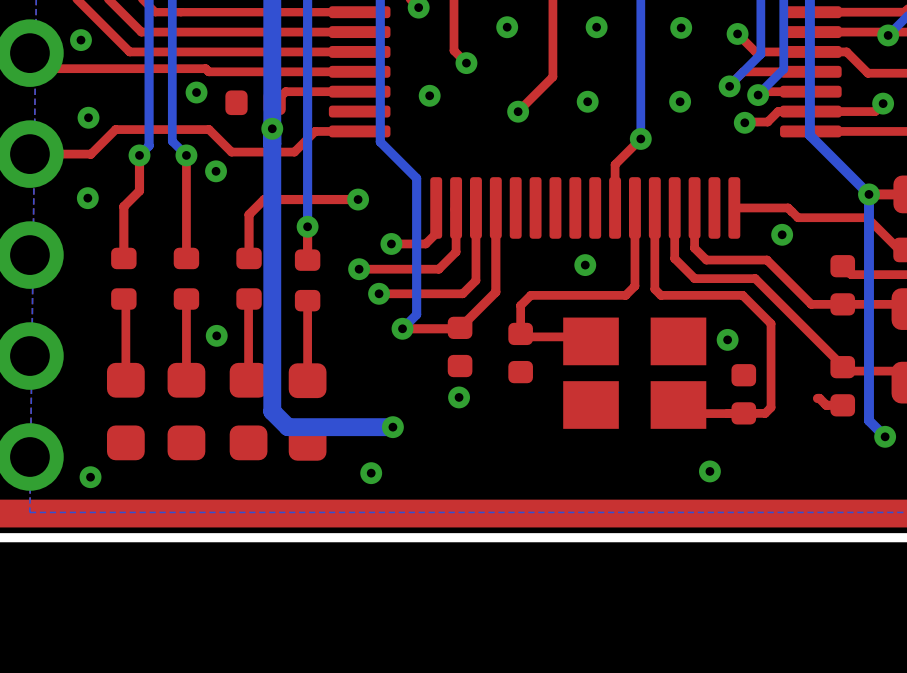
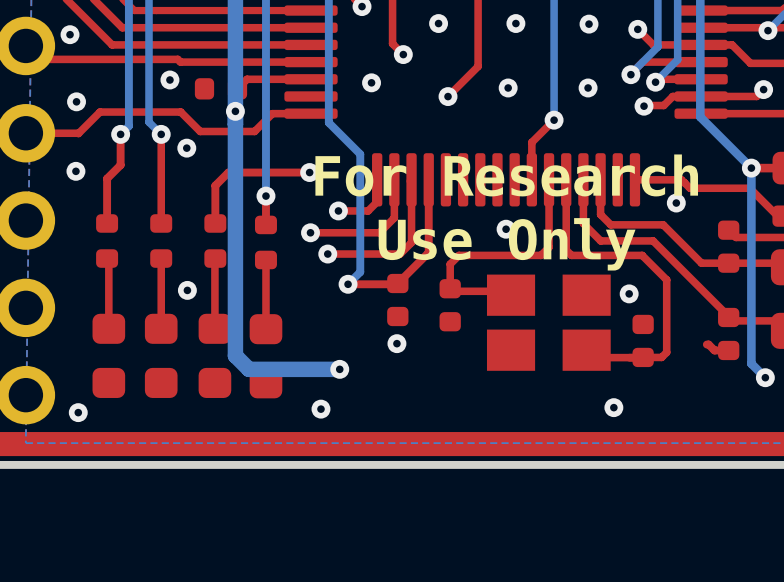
text: none -> For Research (506, 175)
text: none -> Use Only (507, 244)

